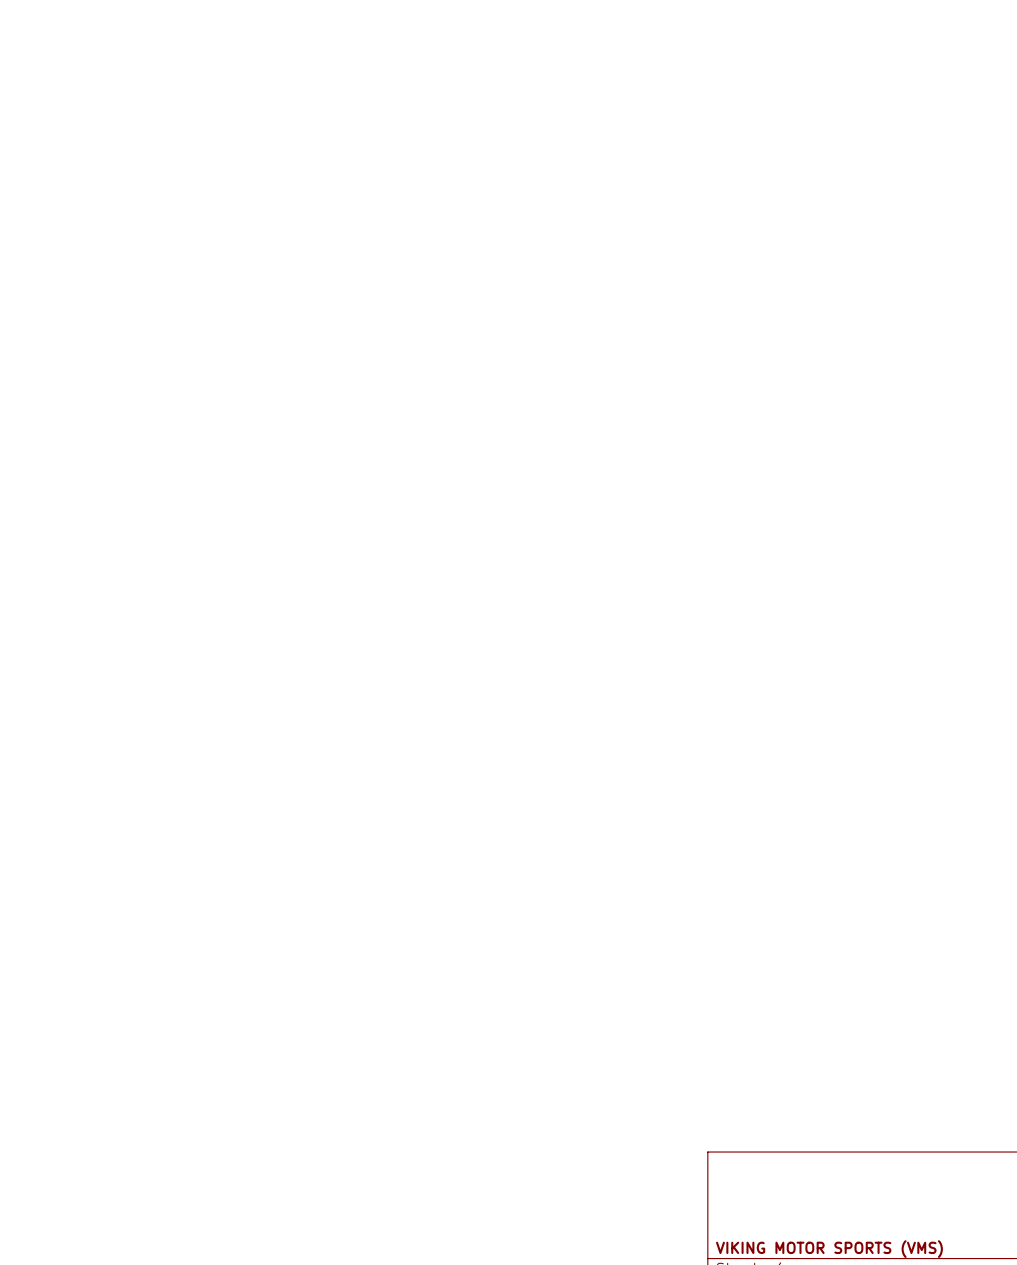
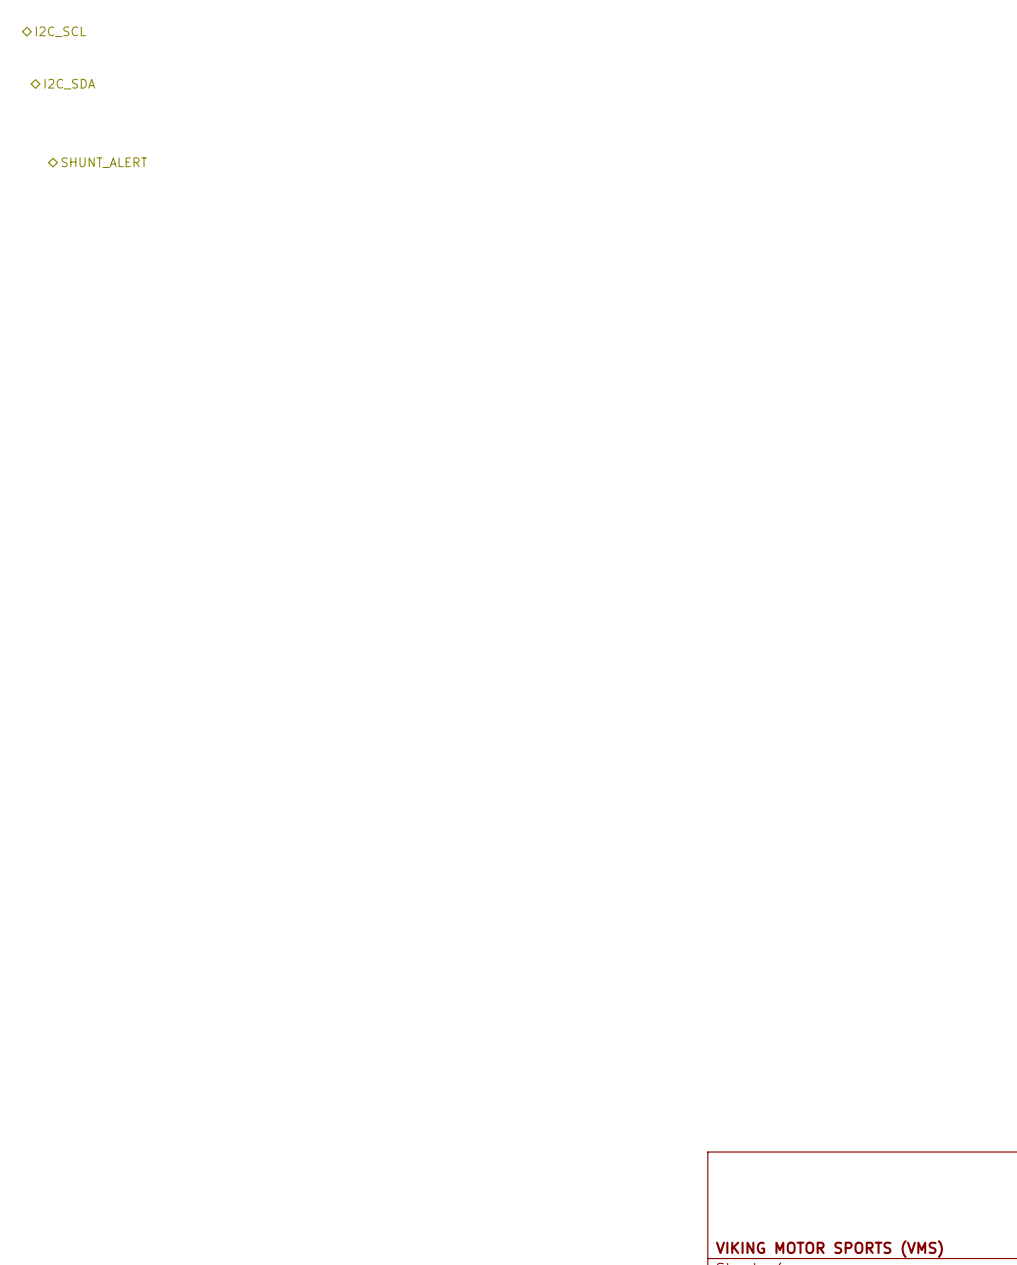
hierarchical label: none -> I2C_SCL (60, 31)
hierarchical label: none -> I2C_SDA (69, 84)
hierarchical label: none -> SHUNT_ALERT (104, 162)

